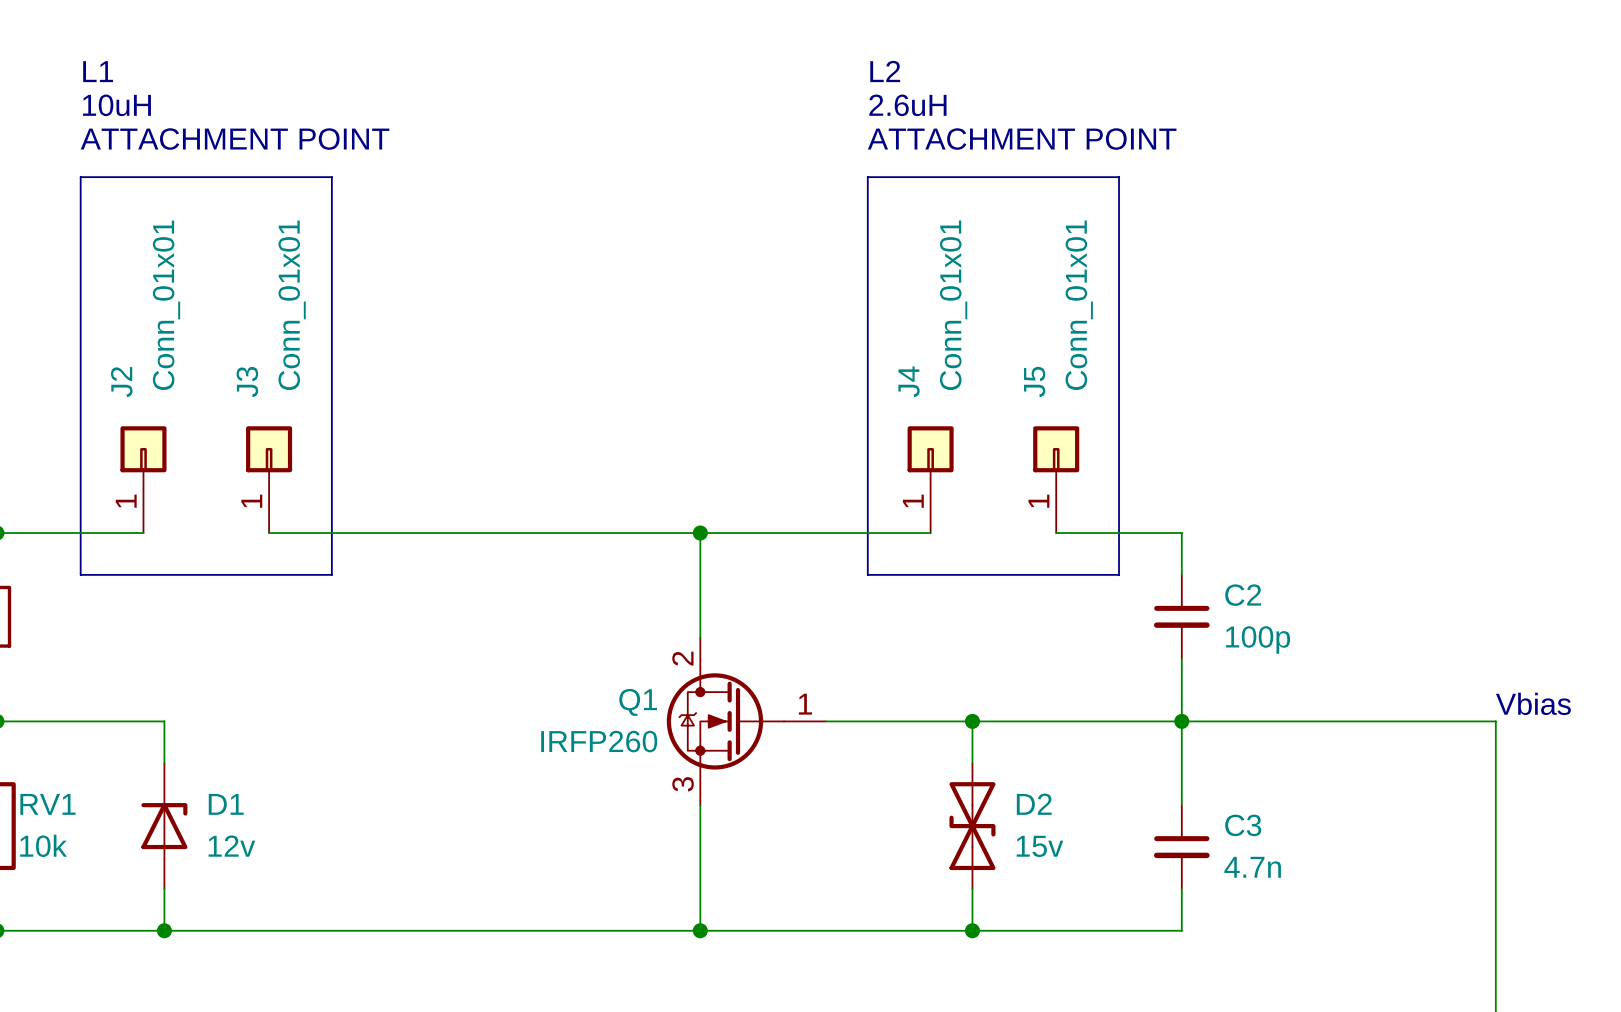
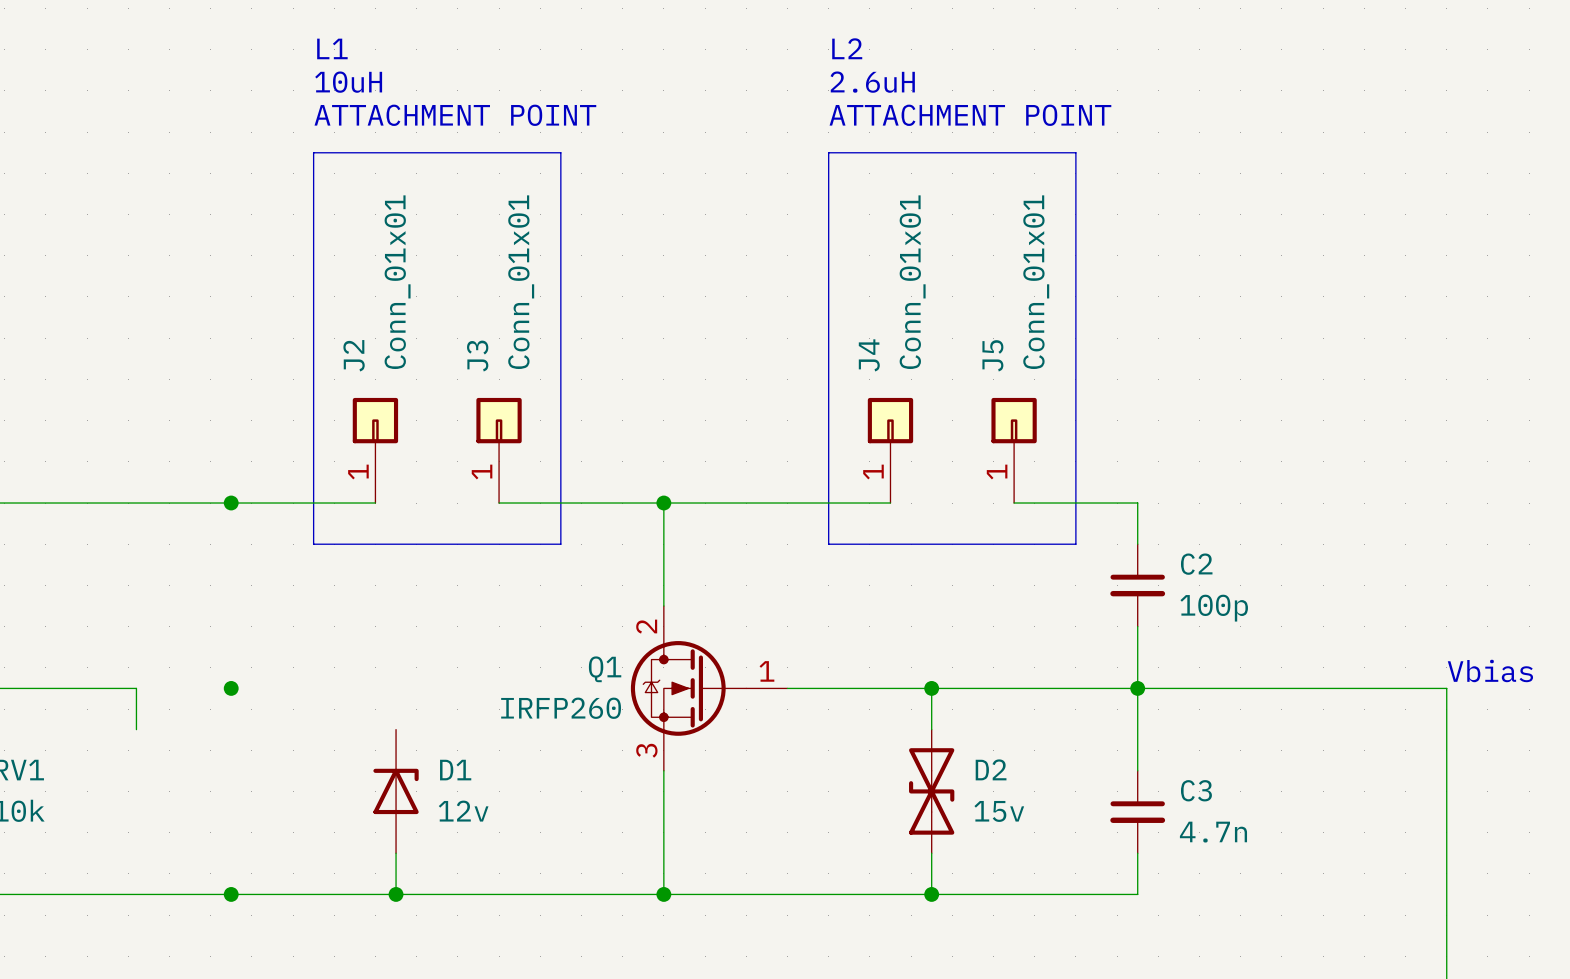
text position: L1 (98, 71) -> L1 (332, 48)
text position: 10uH (116, 105) -> 10uH (348, 82)
text position: ATTACHMENT POINT (235, 139) -> ATTACHMENT POINT (455, 115)
line: (80, 177) (331, 177) (331, 574) (80, 574) (80, 177) -> (313, 152) (560, 152) (560, 544) (313, 544) (313, 152)
J2 position: (143, 479) -> (375, 450)
J3 position: (269, 479) -> (499, 450)
junction: none -> (231, 503)
wire: (407, 533) (532, 533) -> (115, 503) (239, 503)
junction: none -> (231, 688)
D1 position: (164, 826) -> (396, 791)
wire: (164, 888) (164, 930) -> (396, 853) (396, 894)
junction position: (164, 930) -> (231, 894)
junction: none -> (396, 894)

